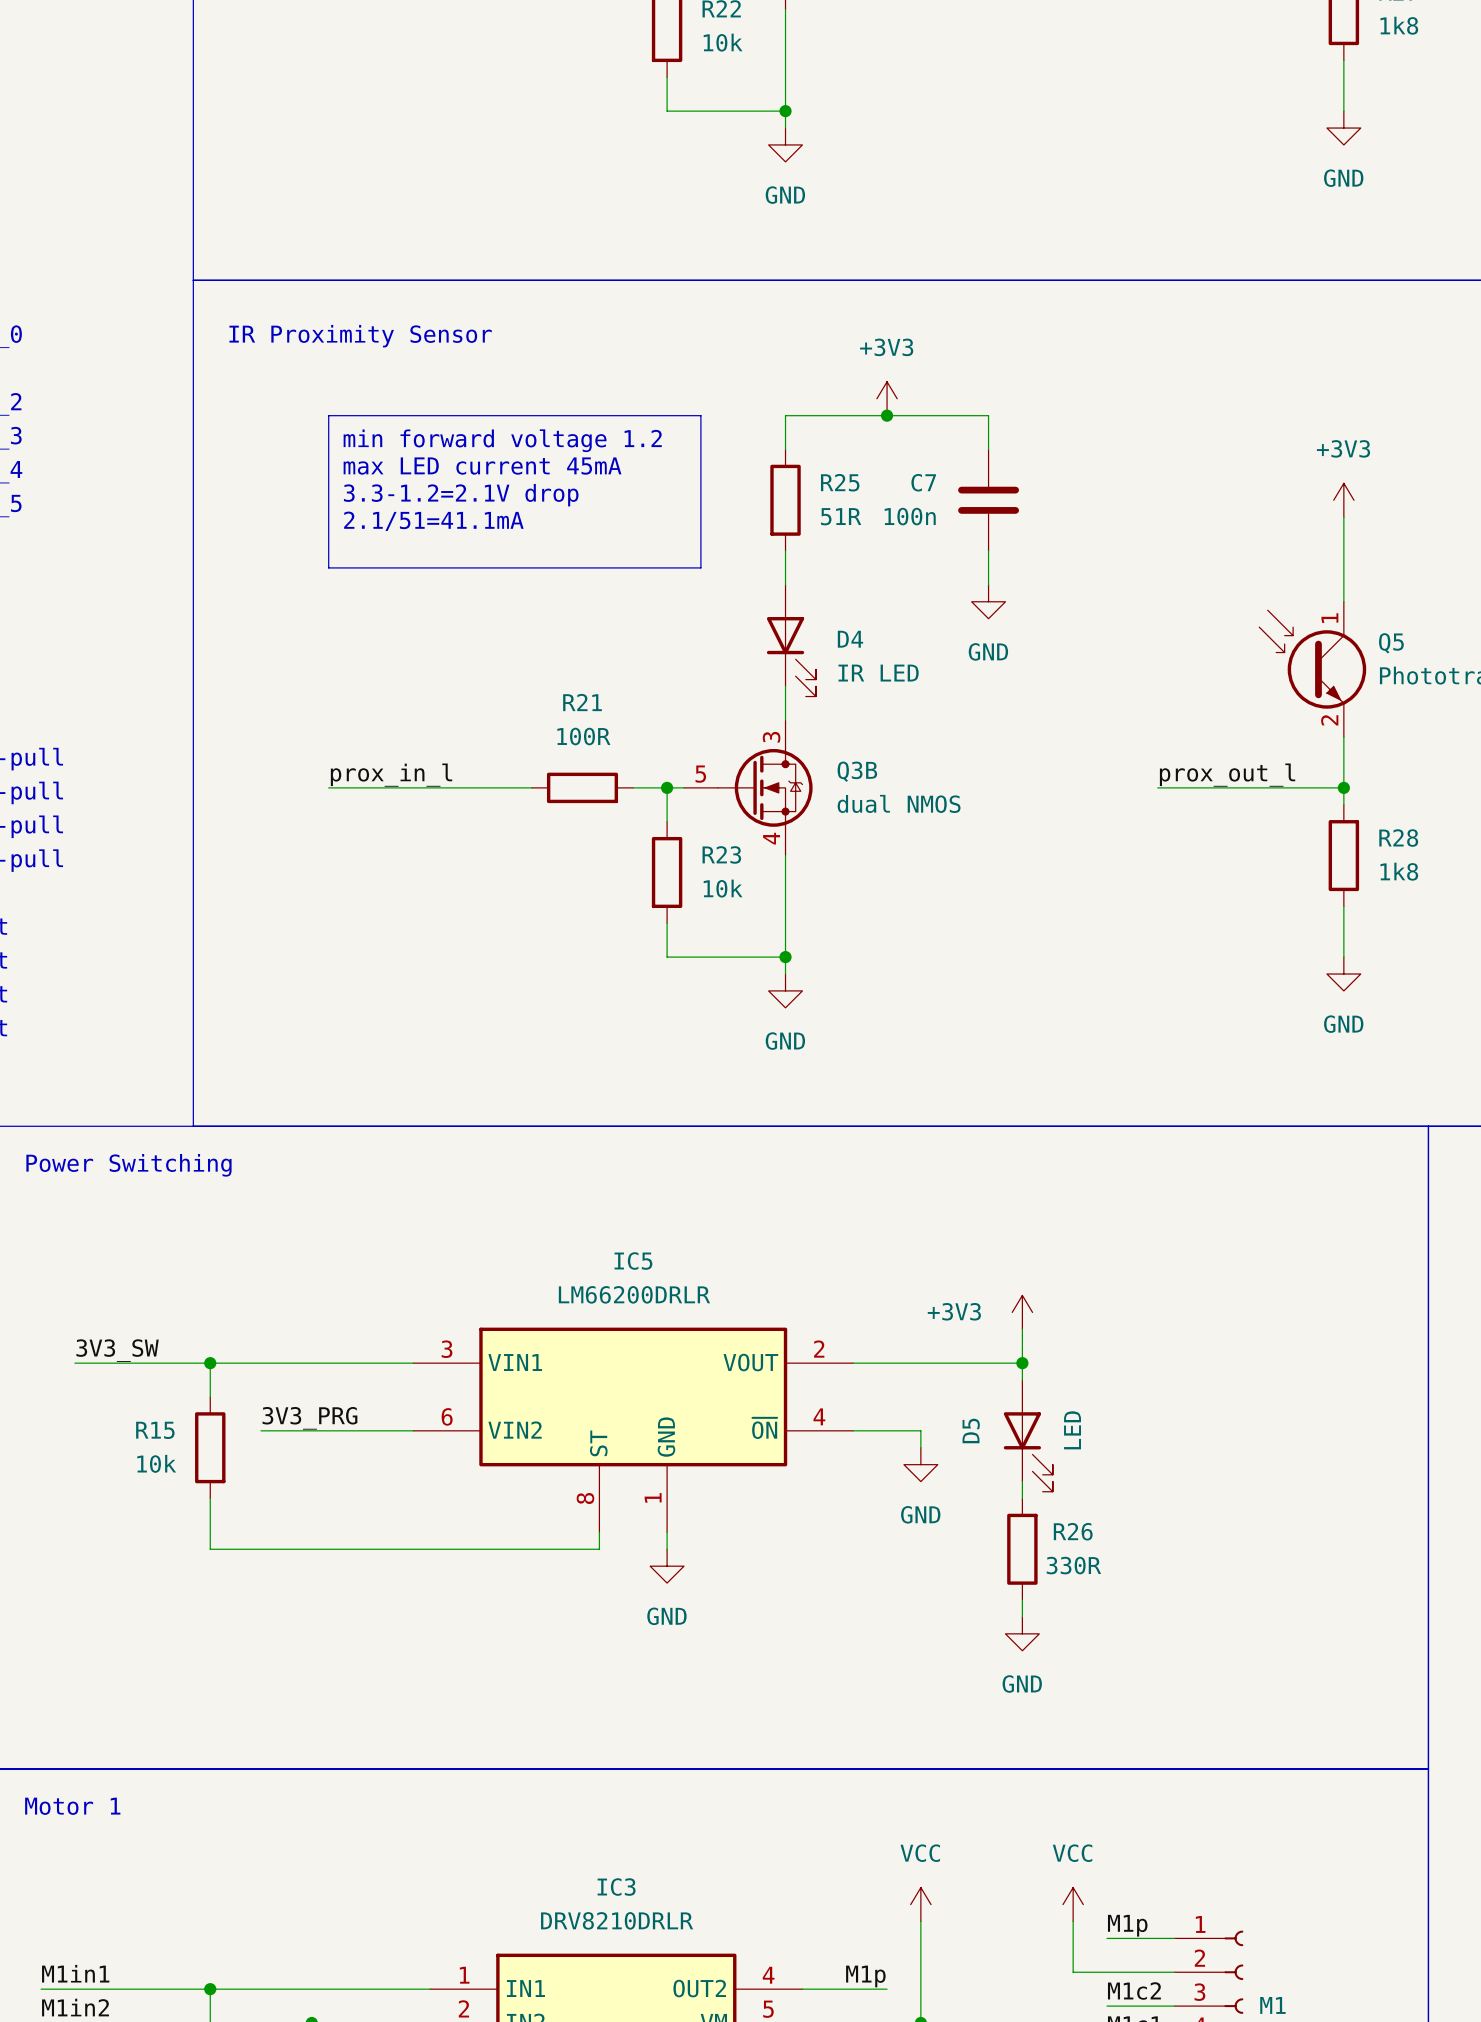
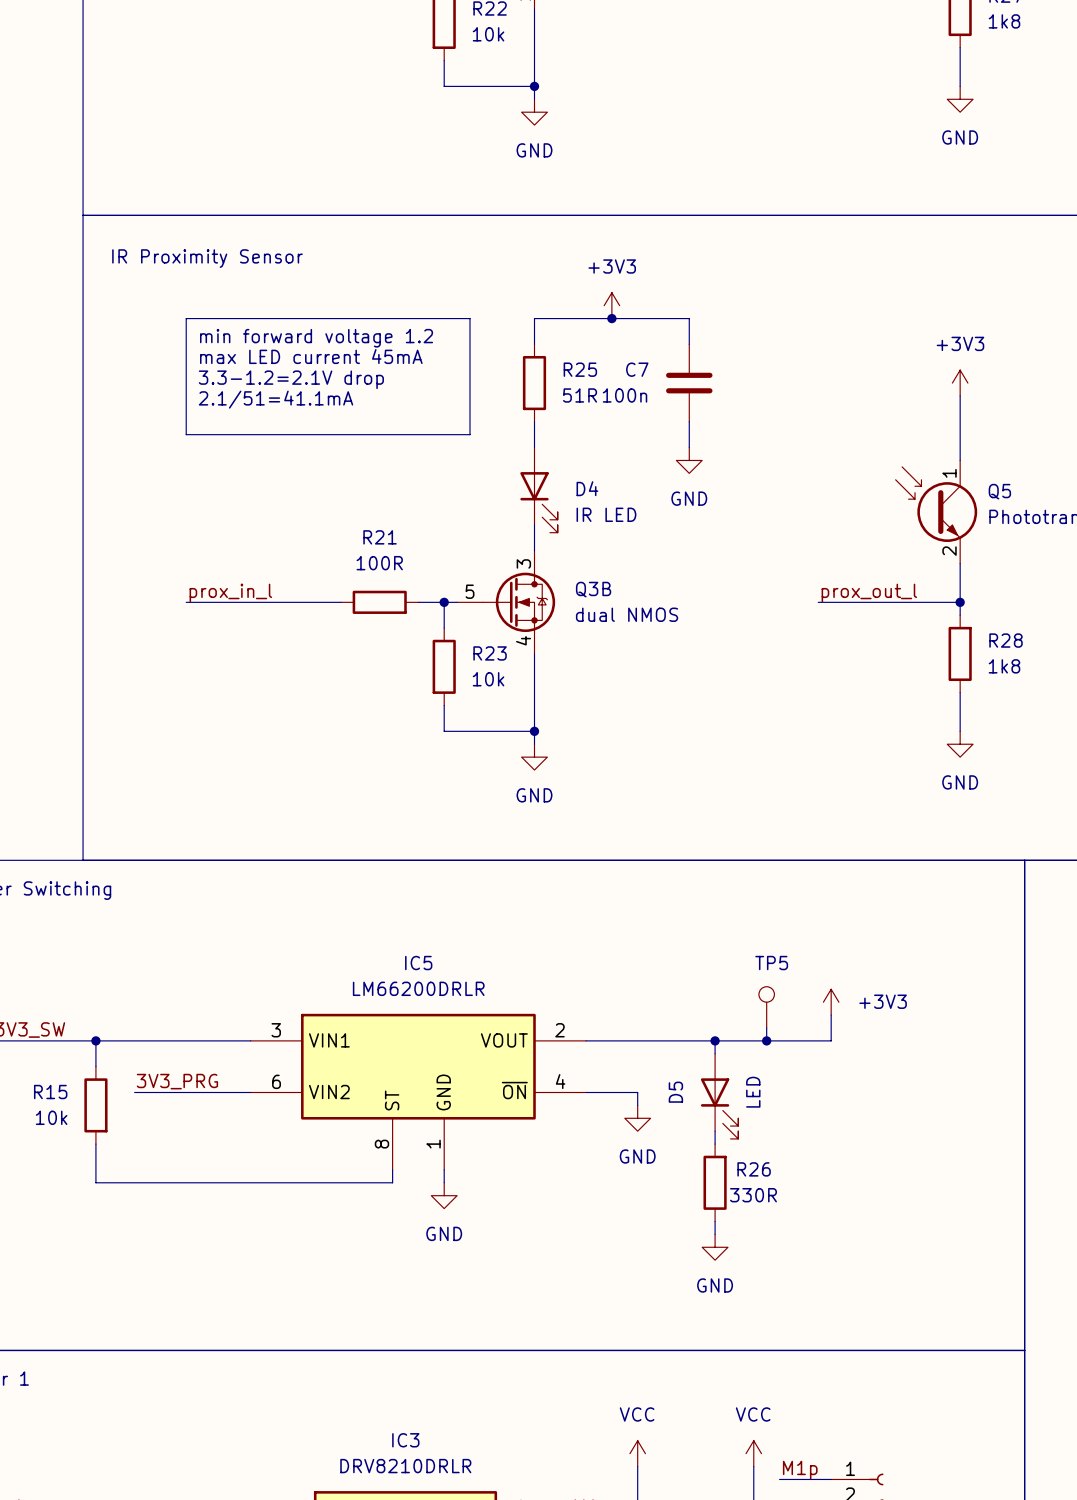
power symbol text position: +3V3 (954, 1311) -> +3V3 (883, 1001)
power symbol position: +3V3 (1022, 1312) -> +3V3 (831, 1002)
TP5: none -> (766, 1007)
wire: (1022, 1329) (1022, 1363) -> (831, 1015) (831, 1040) (715, 1040)
wire: none -> (766, 1028) (766, 1040)
junction: none -> (766, 1040)

